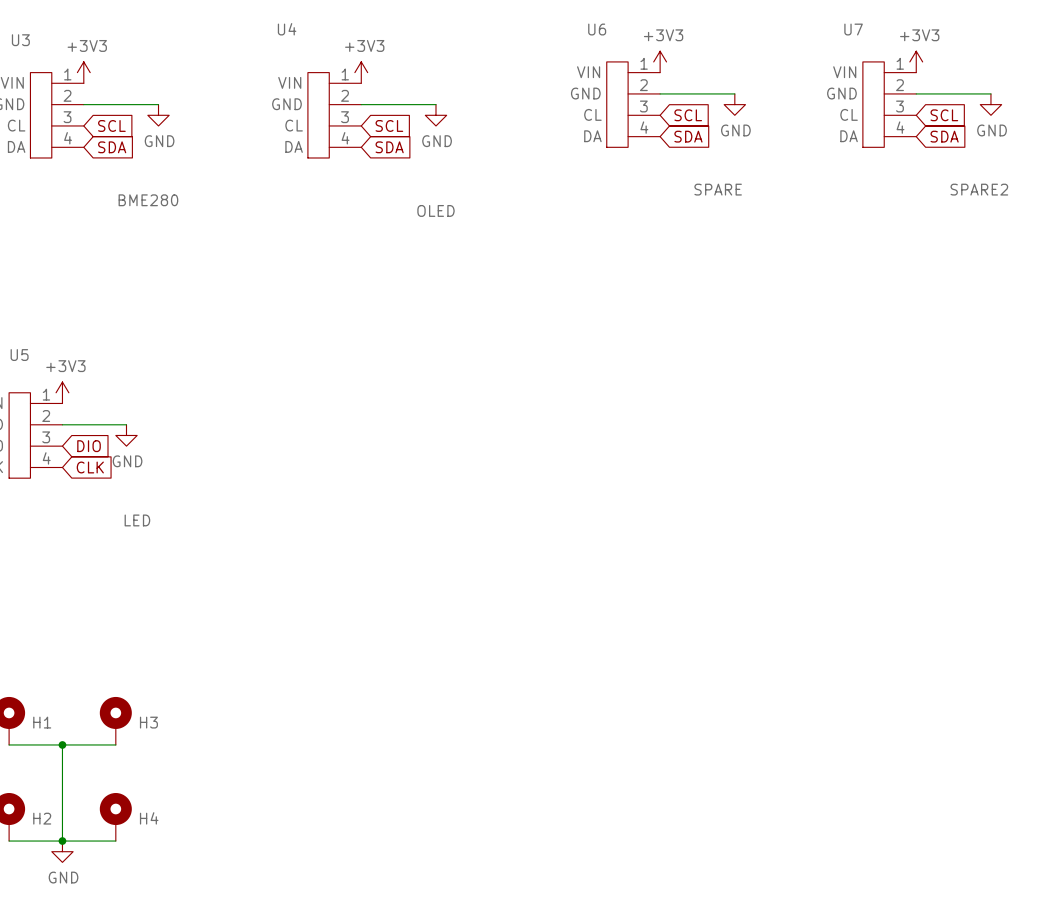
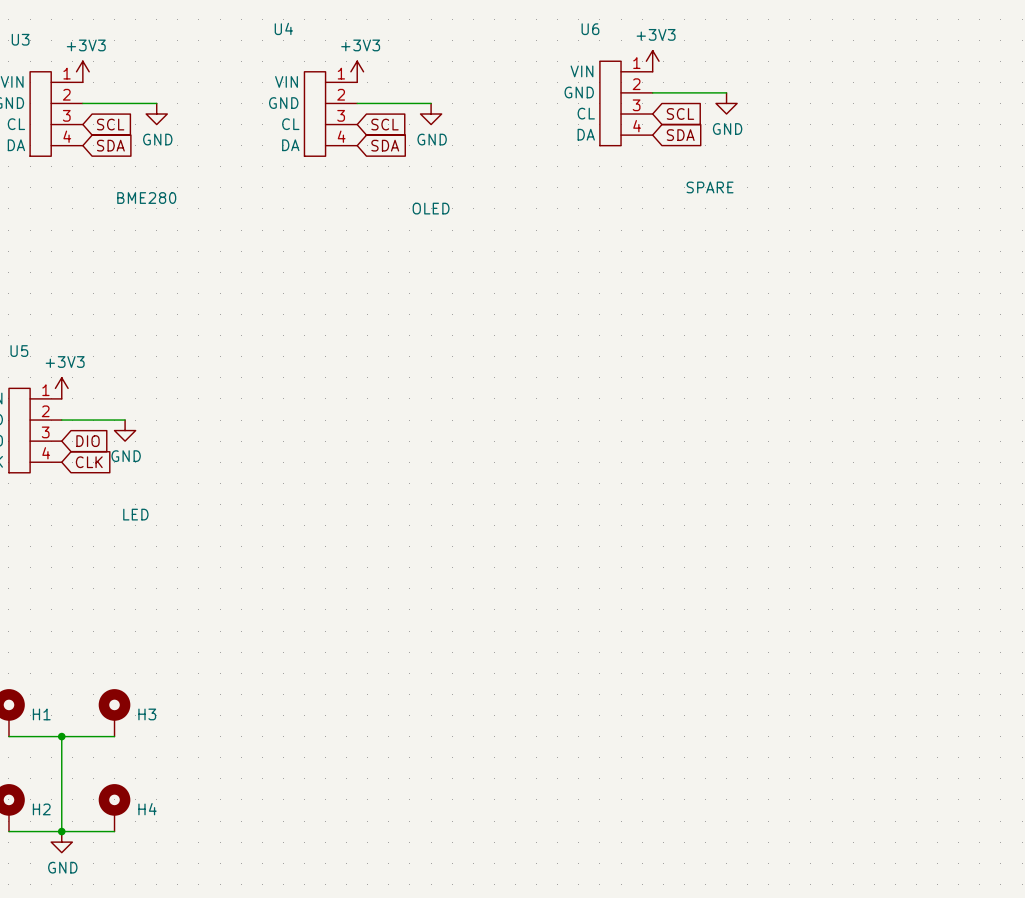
power symbol: +3V3 (916, 61) -> none
wire: (916, 93) (990, 93) -> none
U7: SPARE2 (889, 104) -> none
power symbol: GND (990, 104) -> none
global label: SCL (944, 115) -> none
global label: SDA (944, 136) -> none

